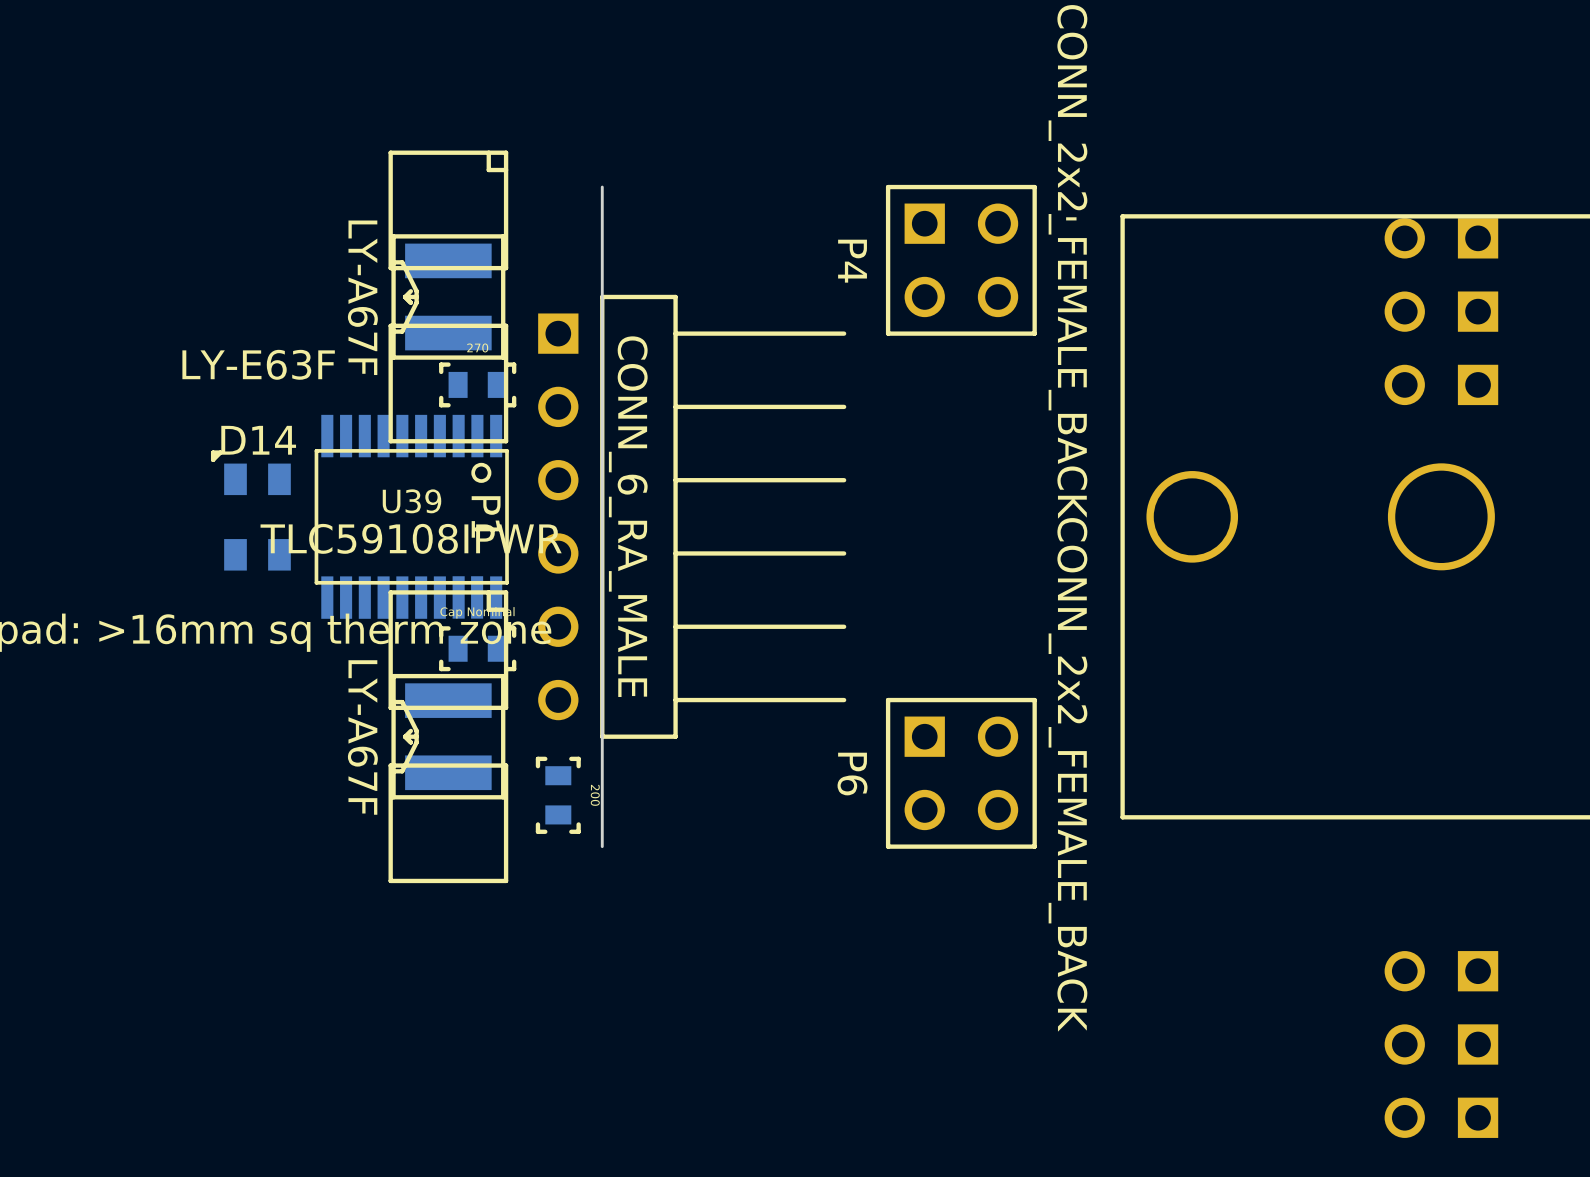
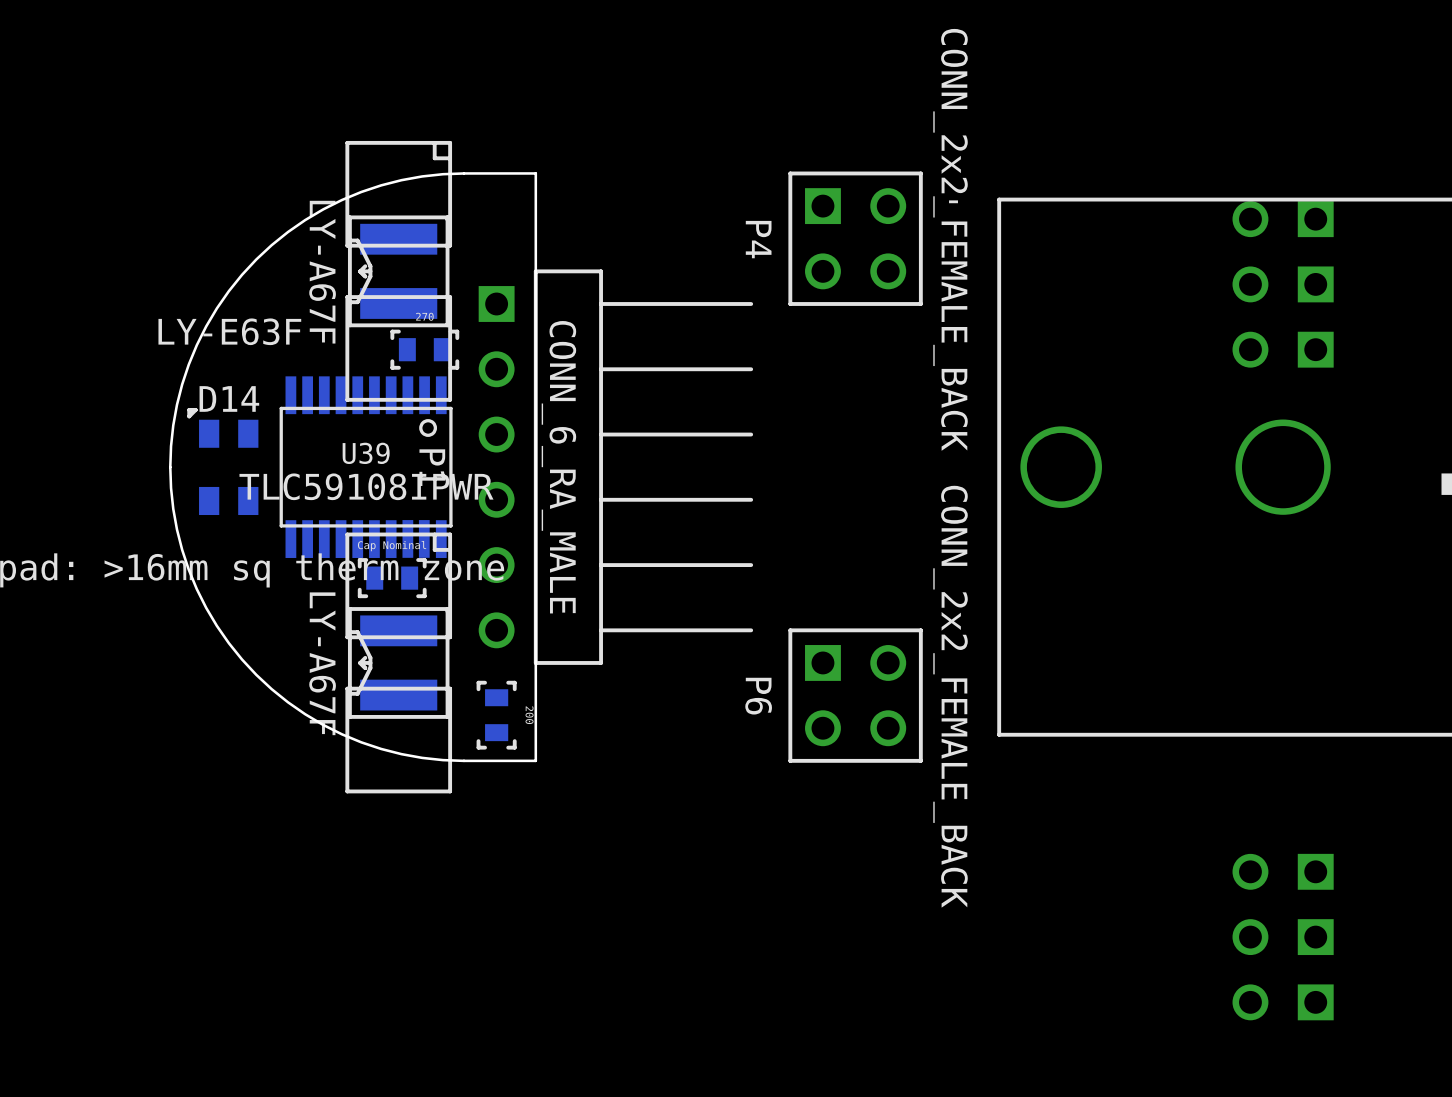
board edge: none -> (535, 173) (443, 174) (401, 180) (341, 200) (287, 232) (256, 259) (228, 291) (196, 345) (177, 404) (170, 467) (177, 529) (196, 589) (216, 625) (242, 659) (287, 702) (341, 734) (401, 754) (443, 760) (535, 760)
part position: (477, 648) -> (392, 578)

